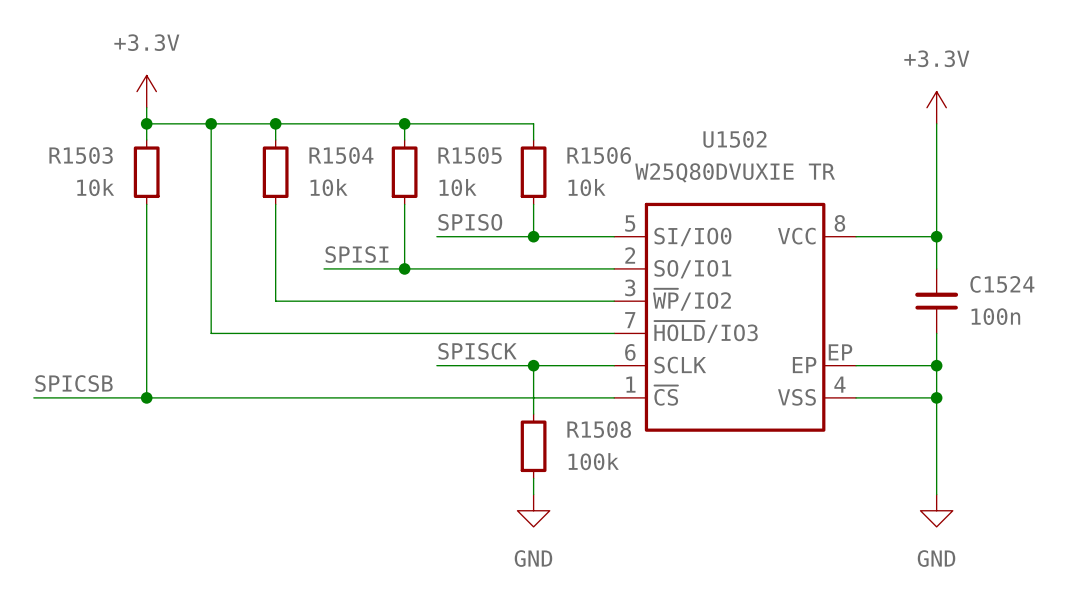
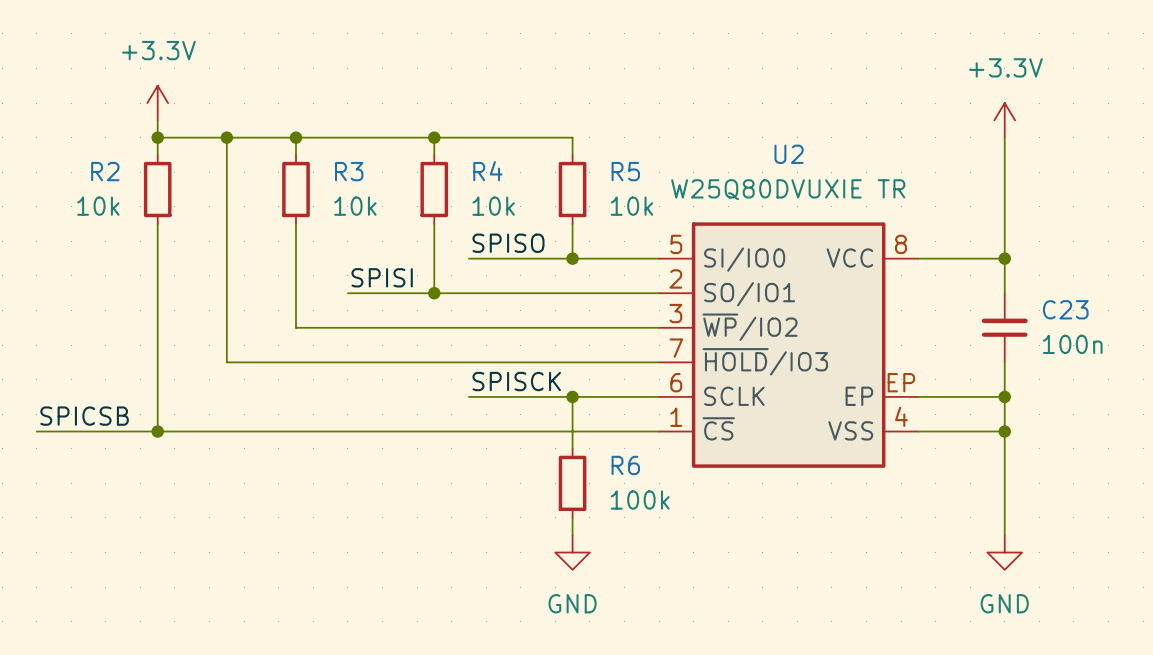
U1502 name: U1502 (734, 139) -> U2 (789, 154)
R1503 name: R1503 (81, 155) -> R2 (105, 171)
R1504 name: R1504 (341, 155) -> R3 (349, 171)
R1505 name: R1505 (470, 155) -> R4 (487, 171)
R1506 name: R1506 (599, 155) -> R5 (625, 171)
C1524 name: C1524 (1002, 284) -> C23 (1065, 309)
R1508 name: R1508 (599, 429) -> R6 (625, 465)

